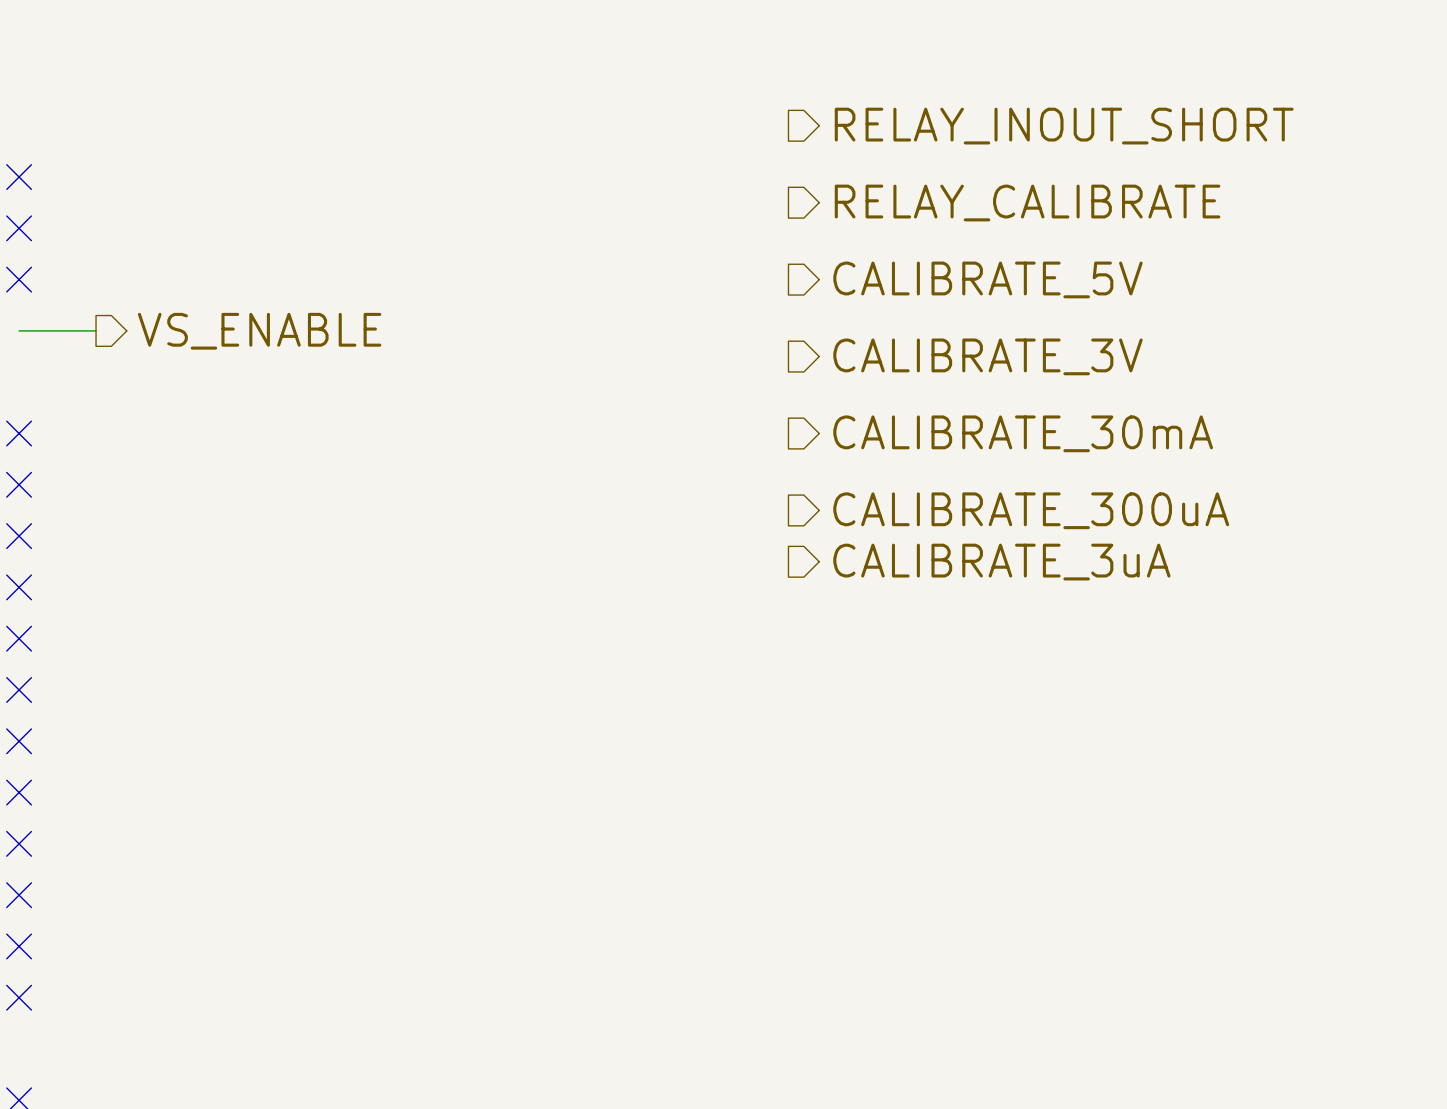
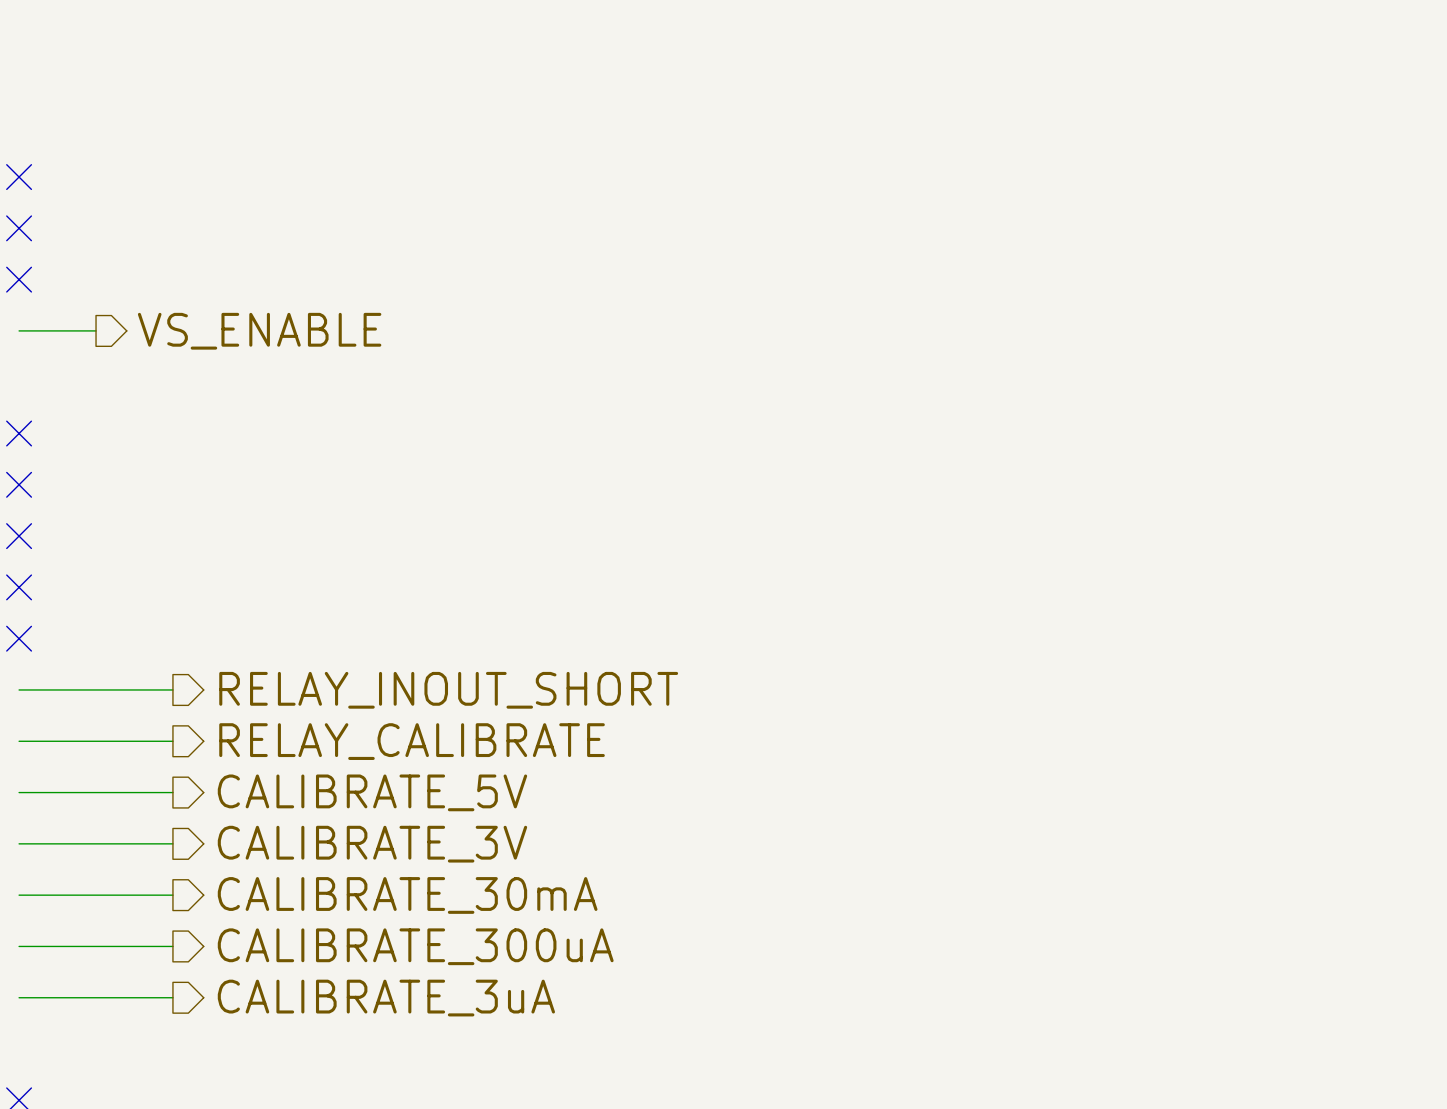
hierarchical label: RELAY_INOUT_SHORT (1064, 126) -> none
hierarchical label: RELAY_CALIBRATE (1027, 203) -> none
hierarchical label: CALIBRATE_5V (987, 279) -> none
hierarchical label: CALIBRATE_3V (987, 356) -> none
hierarchical label: CALIBRATE_30mA (1023, 433) -> none
hierarchical label: CALIBRATE_300uA (1031, 510) -> none
hierarchical label: CALIBRATE_3uA (1001, 562) -> none
wire: none -> (19, 689) (172, 689)
no-connect mark: (19, 689) -> none
hierarchical label: none -> RELAY_INOUT_SHORT (448, 690)
wire: none -> (19, 741) (172, 741)
no-connect mark: (19, 741) -> none
hierarchical label: none -> RELAY_CALIBRATE (412, 741)
wire: none -> (19, 792) (172, 792)
no-connect mark: (19, 792) -> none
hierarchical label: none -> CALIBRATE_5V (372, 792)
wire: none -> (19, 843) (172, 843)
no-connect mark: (19, 843) -> none
hierarchical label: none -> CALIBRATE_3V (372, 844)
wire: none -> (19, 895) (172, 895)
no-connect mark: (19, 895) -> none
hierarchical label: none -> CALIBRATE_30mA (407, 895)
wire: none -> (19, 946) (172, 946)
no-connect mark: (19, 946) -> none
hierarchical label: none -> CALIBRATE_300uA (415, 946)
wire: none -> (19, 997) (172, 997)
no-connect mark: (19, 997) -> none
hierarchical label: none -> CALIBRATE_3uA (386, 998)

